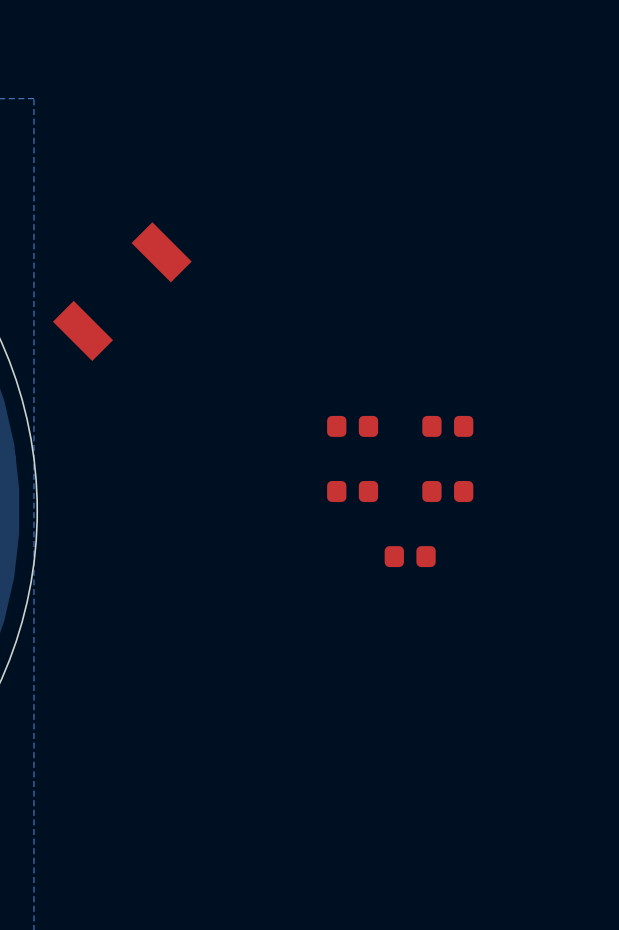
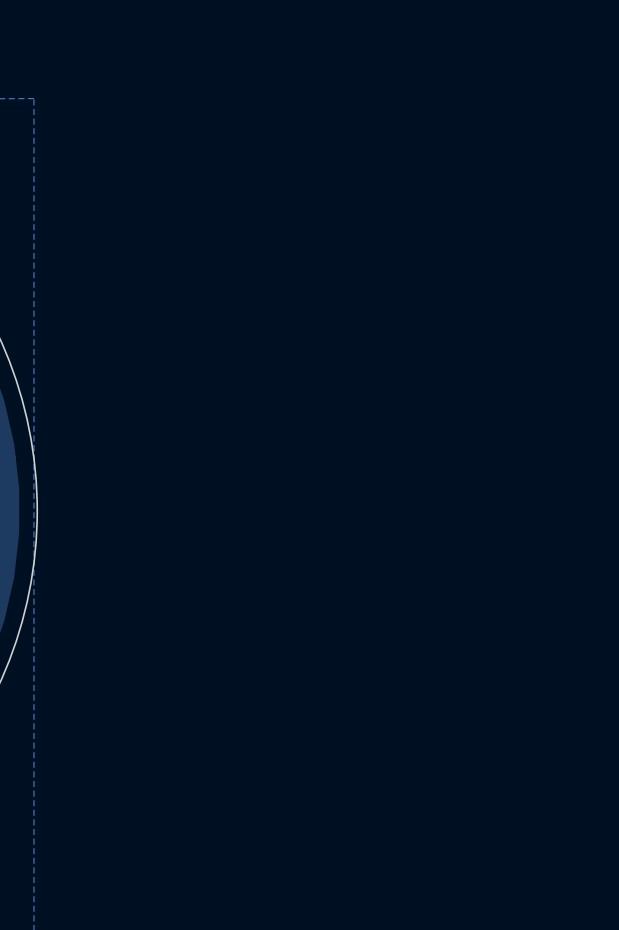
part: (122, 291) -> none
part: (352, 426) -> none
part: (447, 426) -> none
part: (352, 491) -> none
part: (447, 491) -> none
part: (410, 556) -> none

